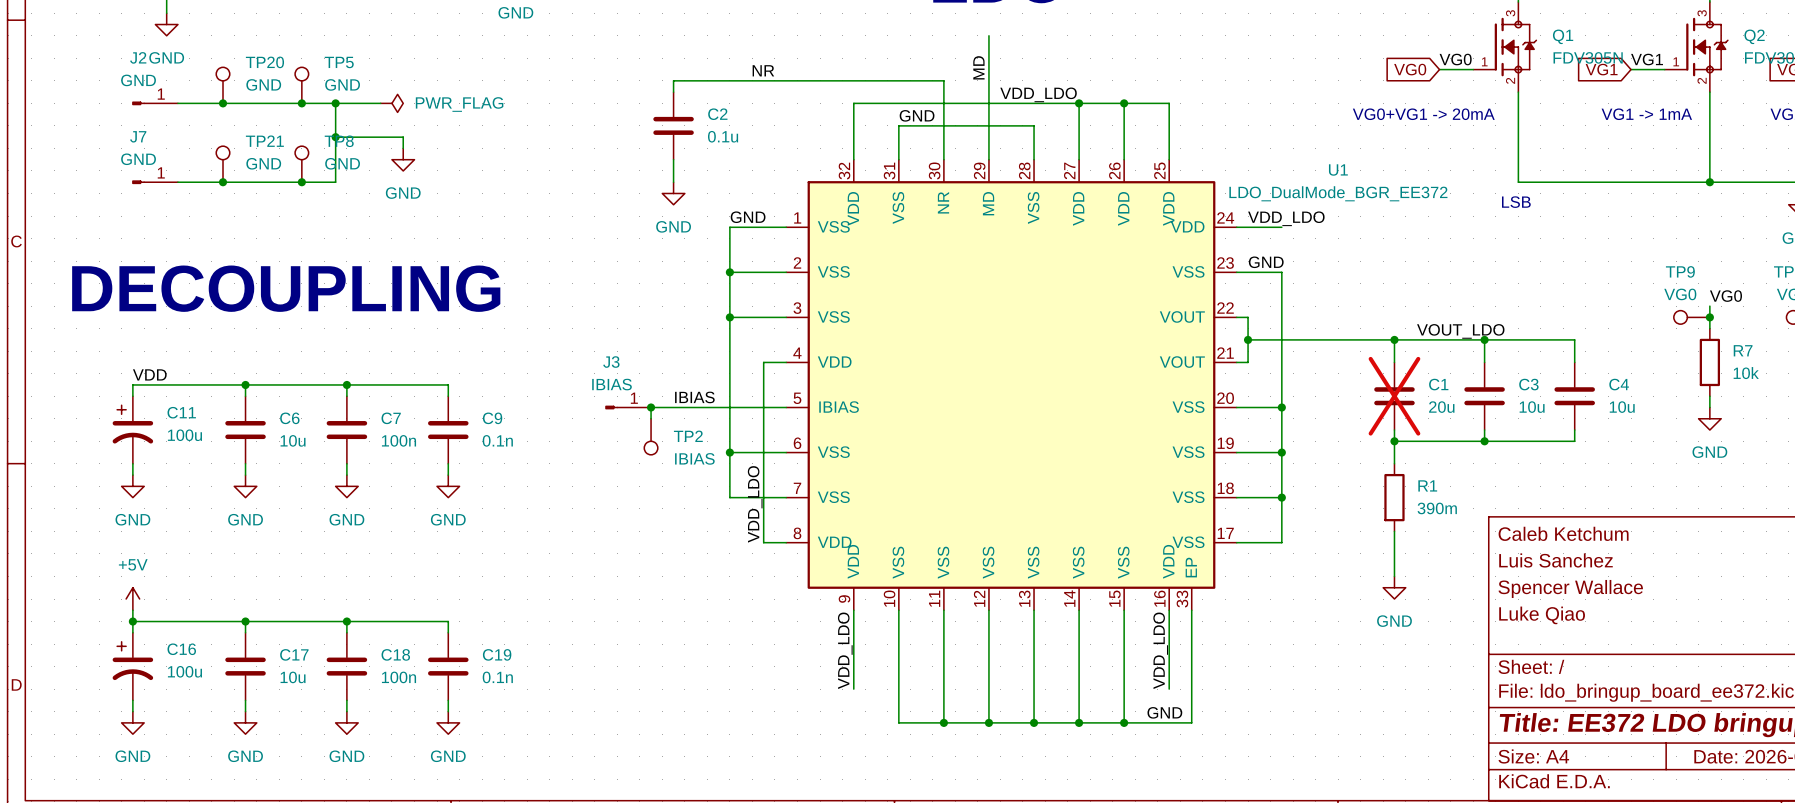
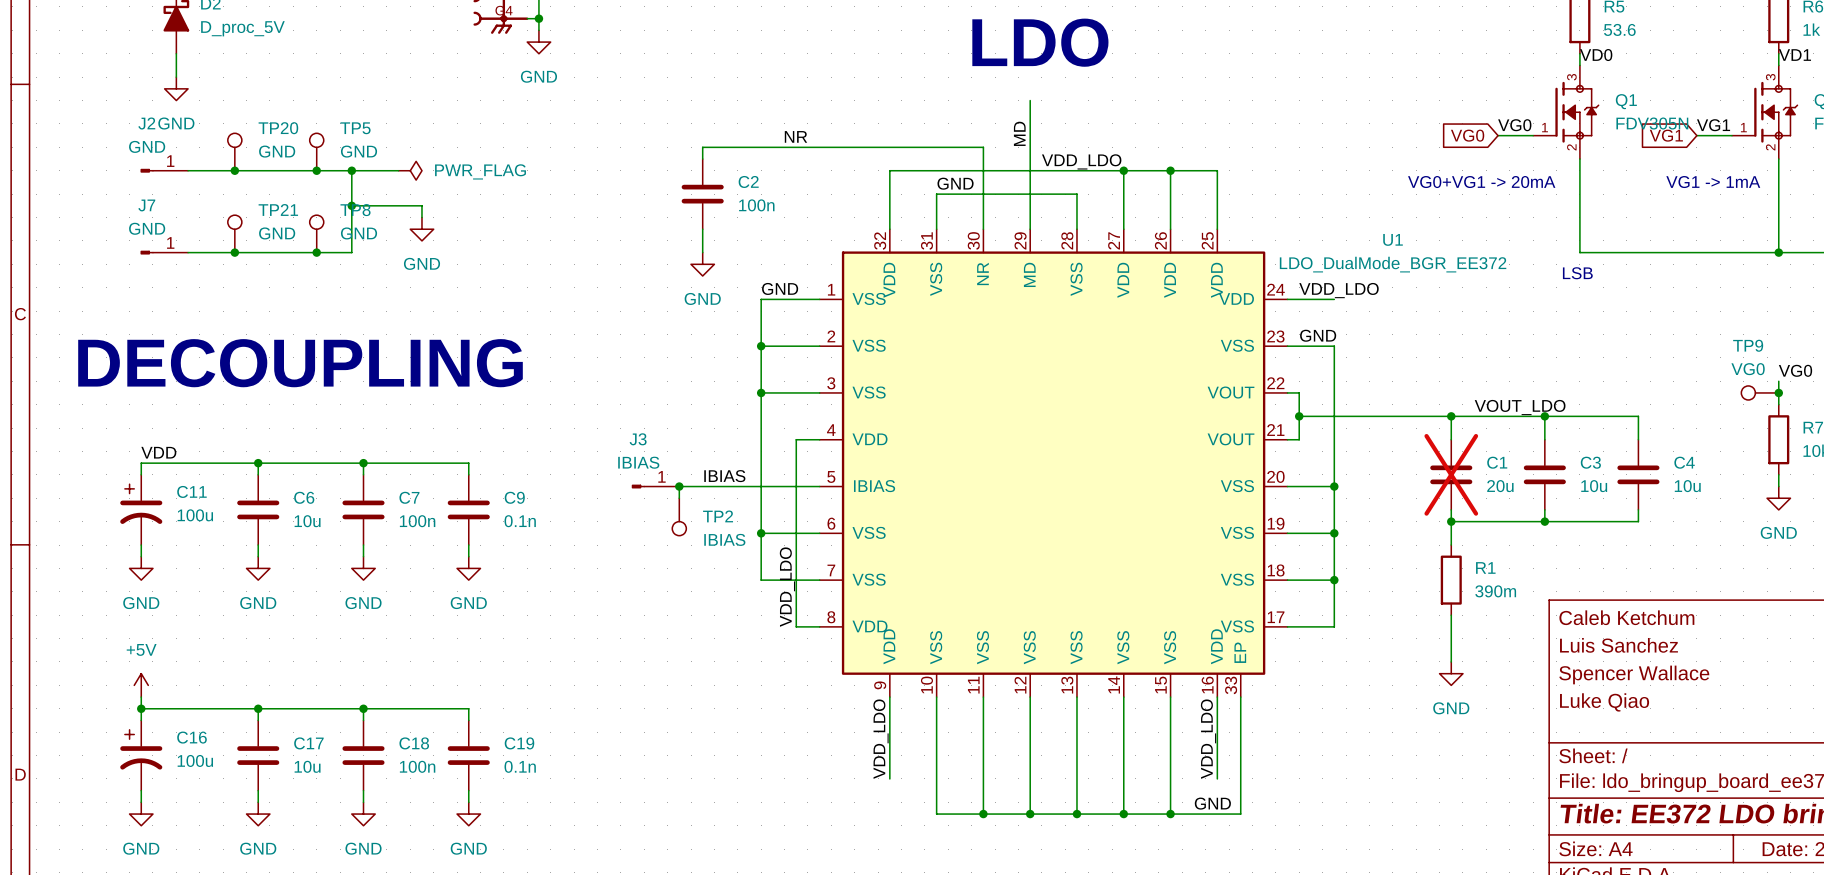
C2 value: 0.1u (723, 136) -> 100n (756, 205)

